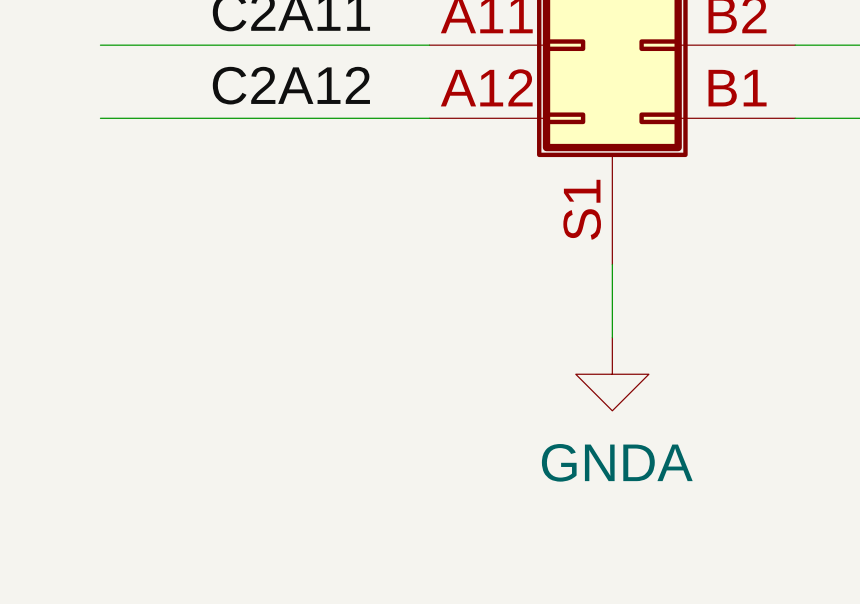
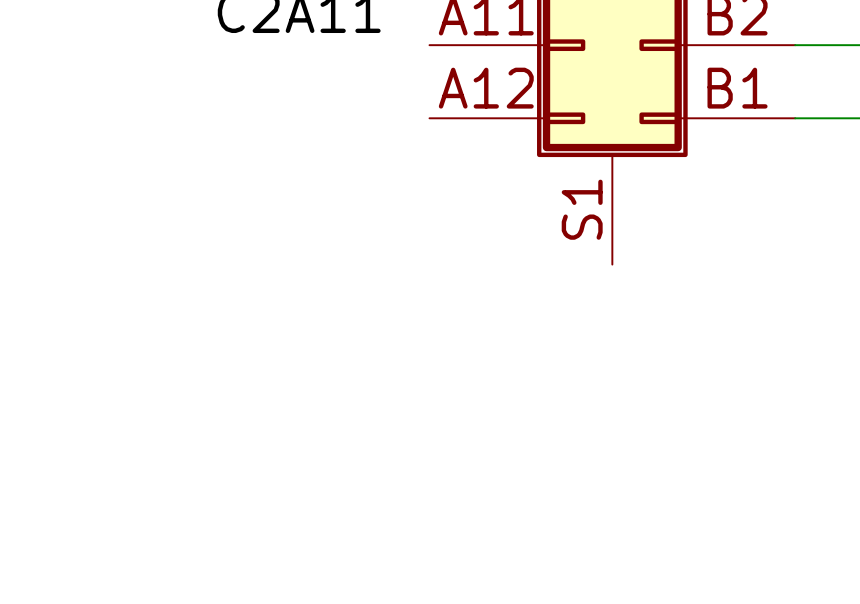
wire: (100, 45) (429, 45) -> none
label: C2A12 (291, 85) -> none
wire: (100, 118) (429, 118) -> none
wire: (612, 264) (612, 337) -> none
power symbol: GNDA (612, 374) -> none

